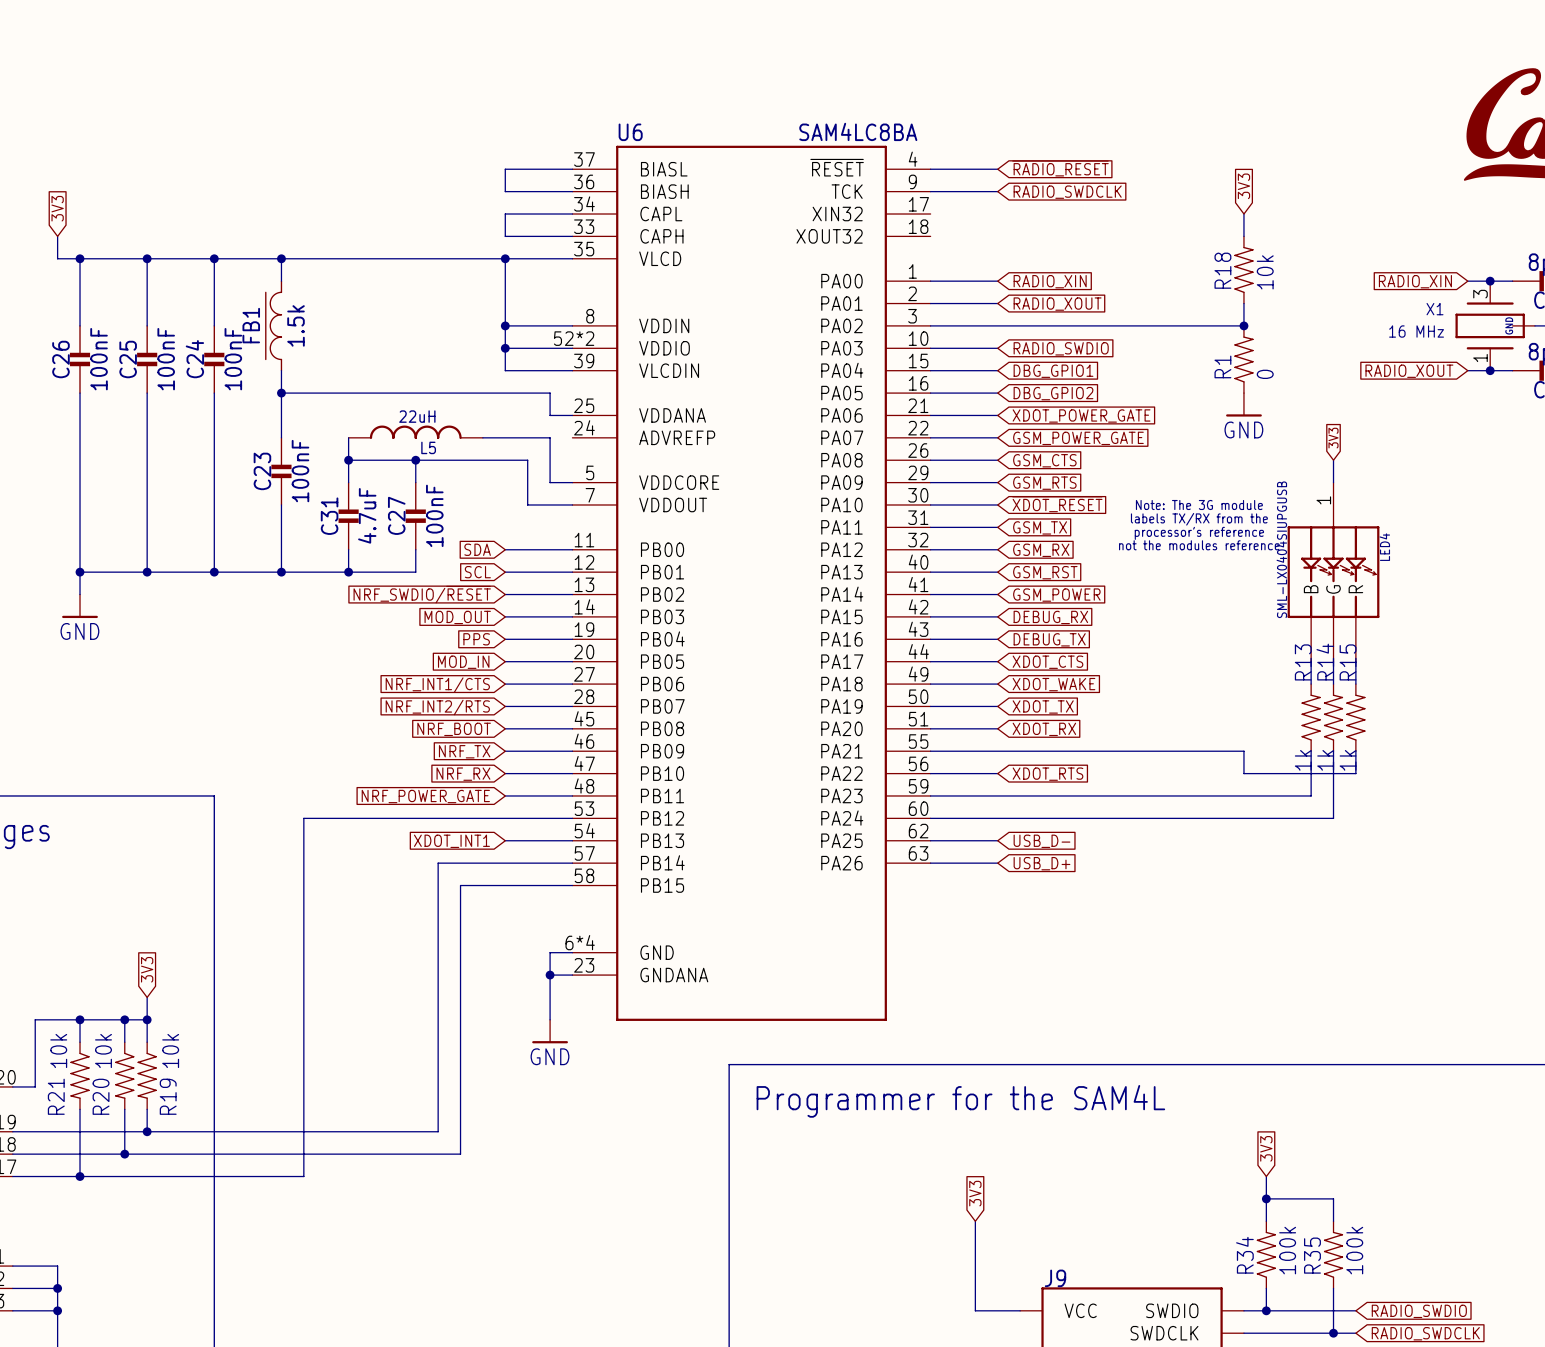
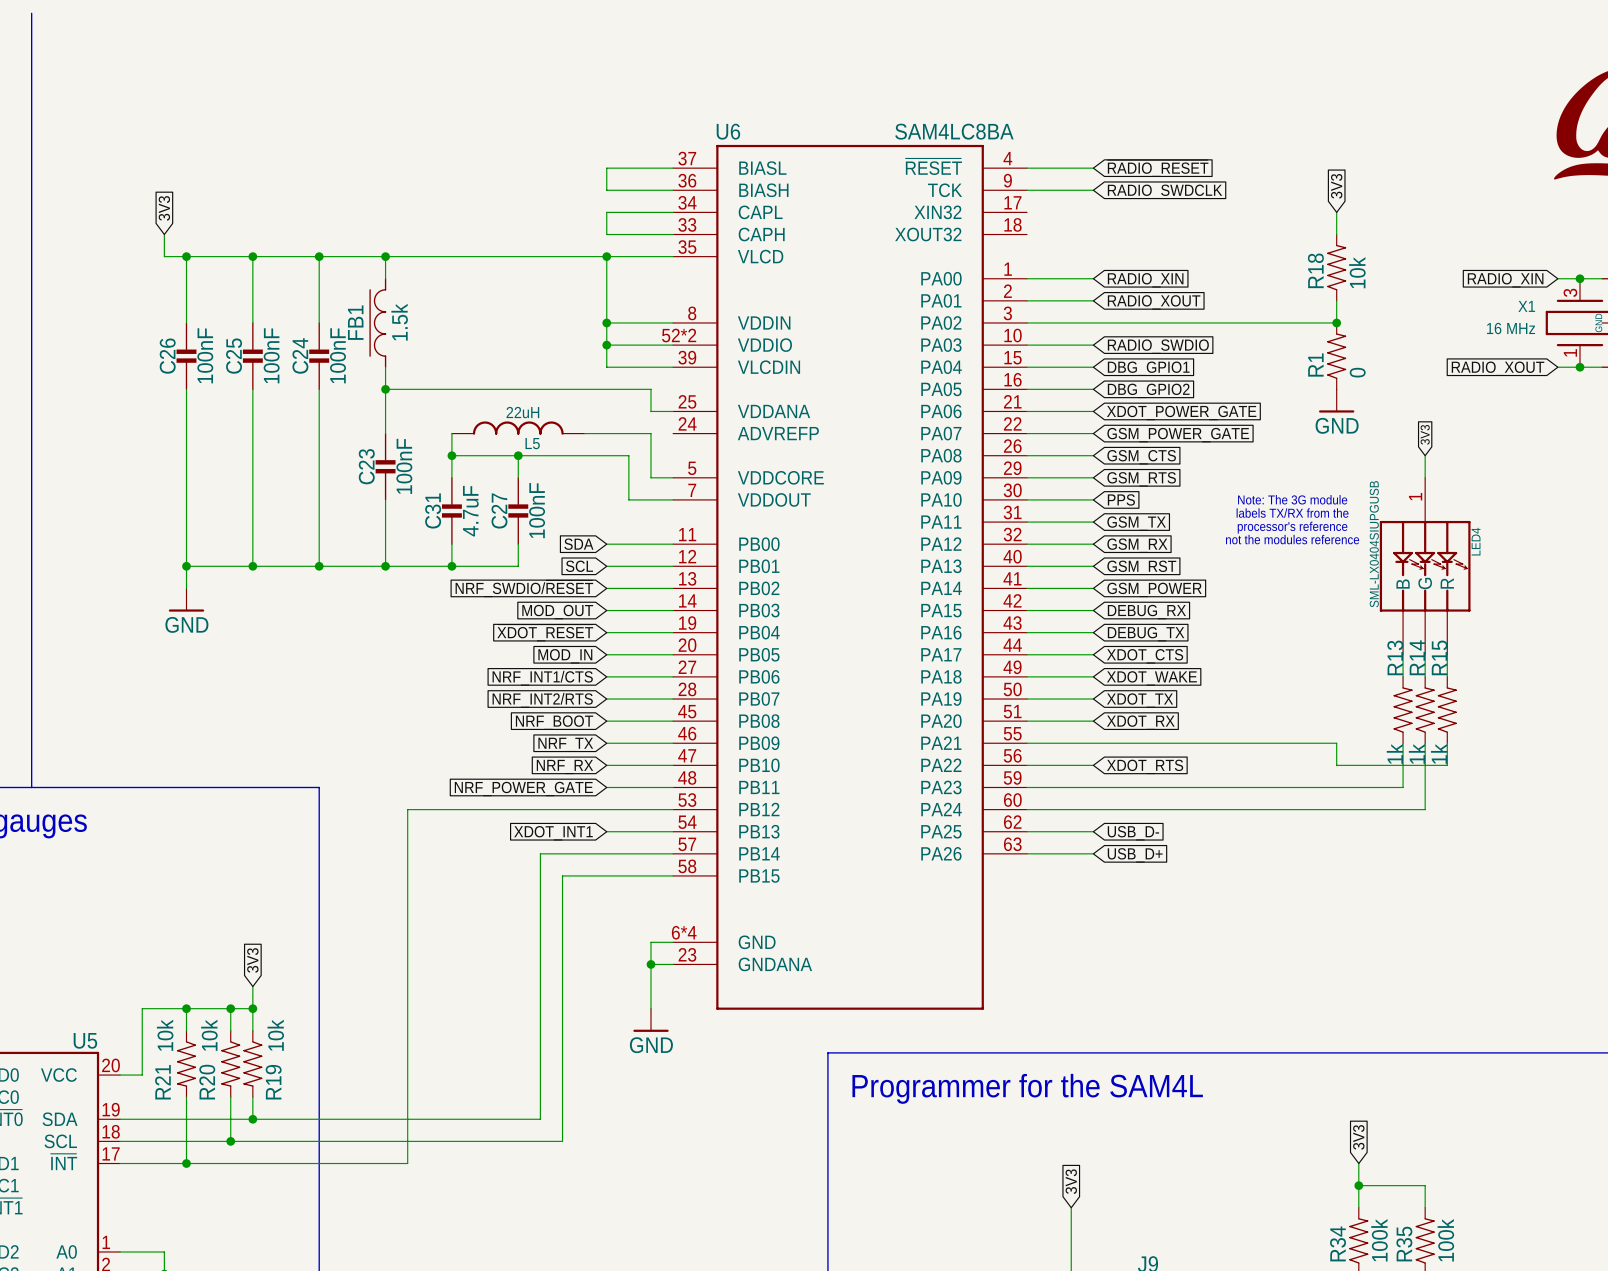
global label: ~{XDOT_RESET} (1057, 504) -> PPS (1121, 499)
global label: PPS (476, 639) -> ~{XDOT_RESET} (545, 632)

